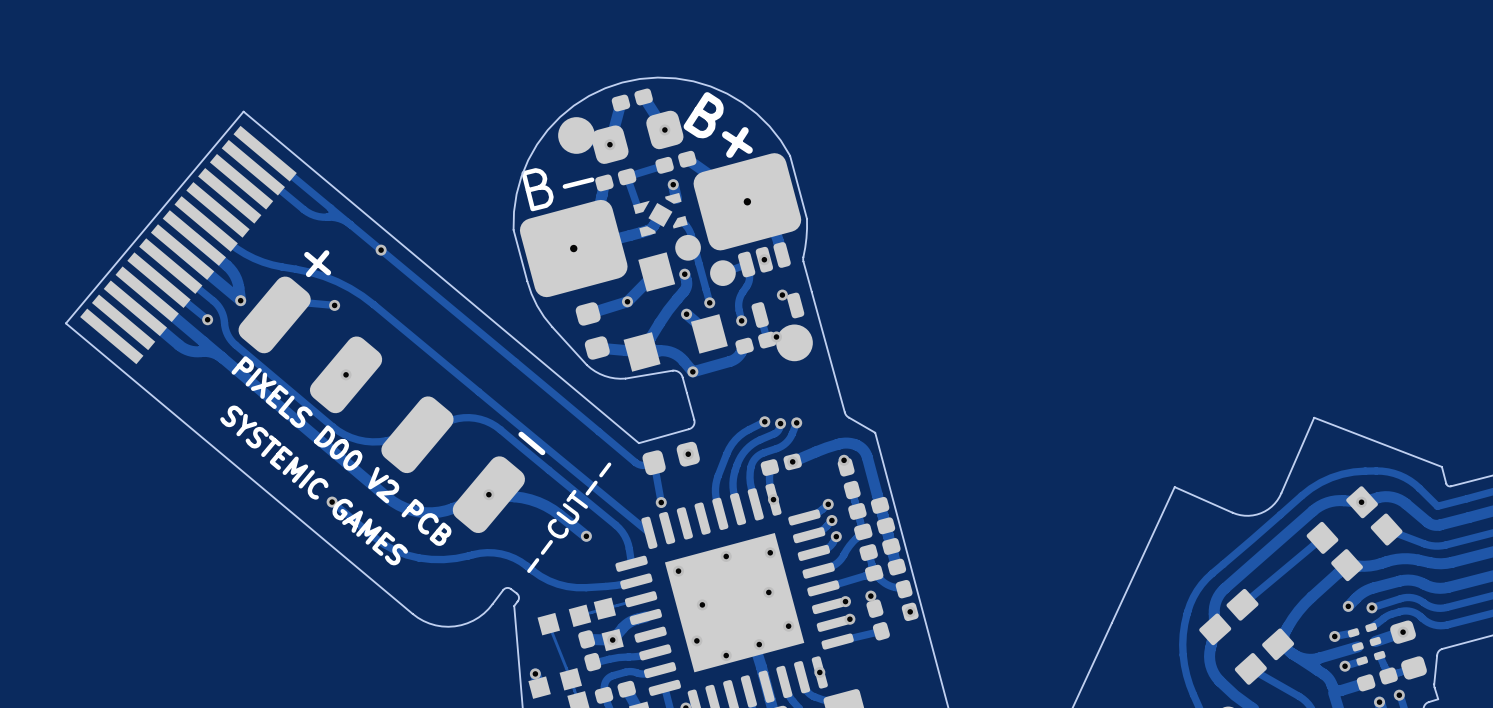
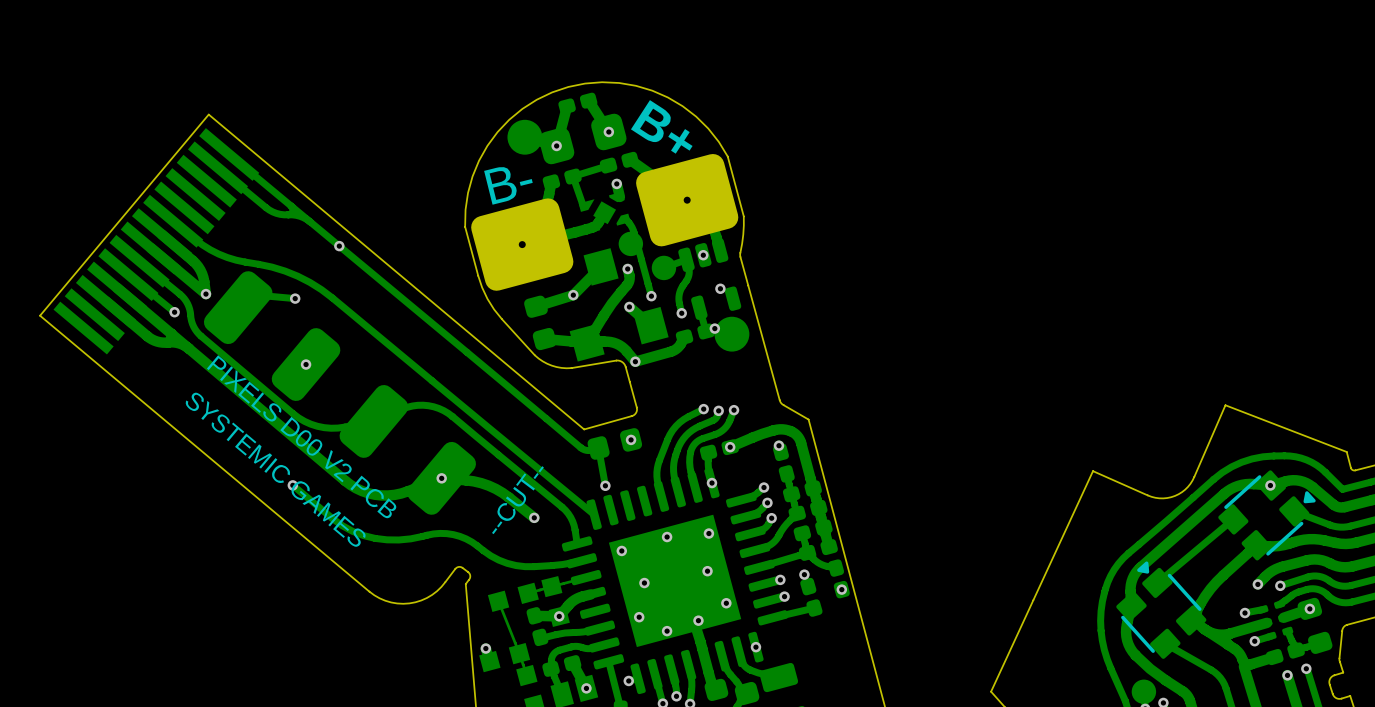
part text: + (317, 263) -> none
part text: - (531, 443) -> none
part footprint: [1306, 486, 1403, 582] -> [1218, 470, 1316, 561]
part footprint: [1199, 588, 1295, 685] -> [1116, 561, 1207, 659]

